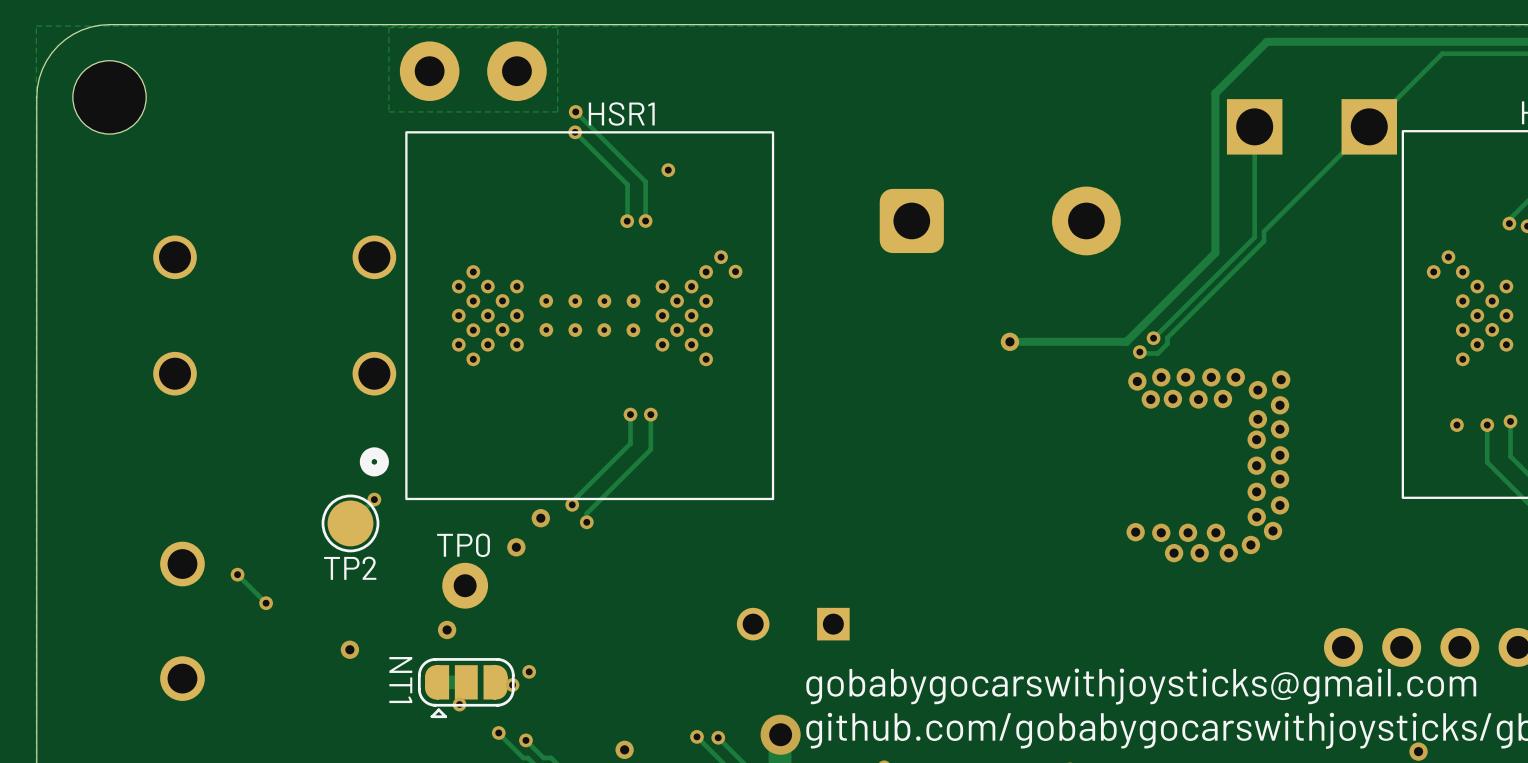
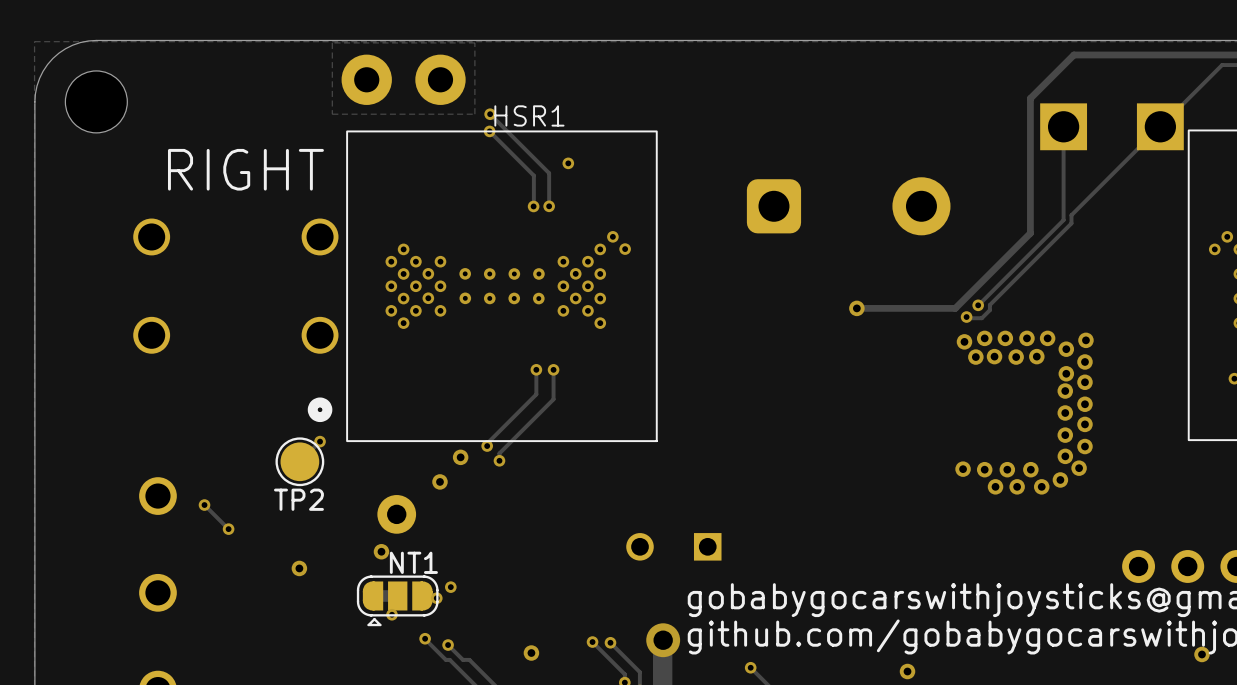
text: none -> RIGHT (245, 169)
part value: TP0 (463, 545) -> none
NT1 name rotation: 0° (400, 680) -> 90° counterclockwise (413, 562)
NT1 name position: NT1 (400, 680) -> NT1 (413, 562)

